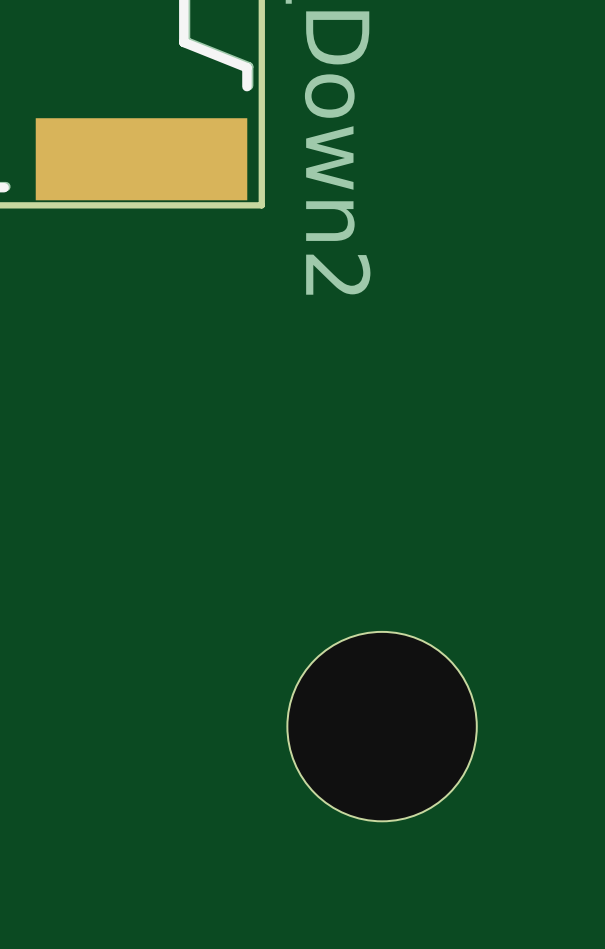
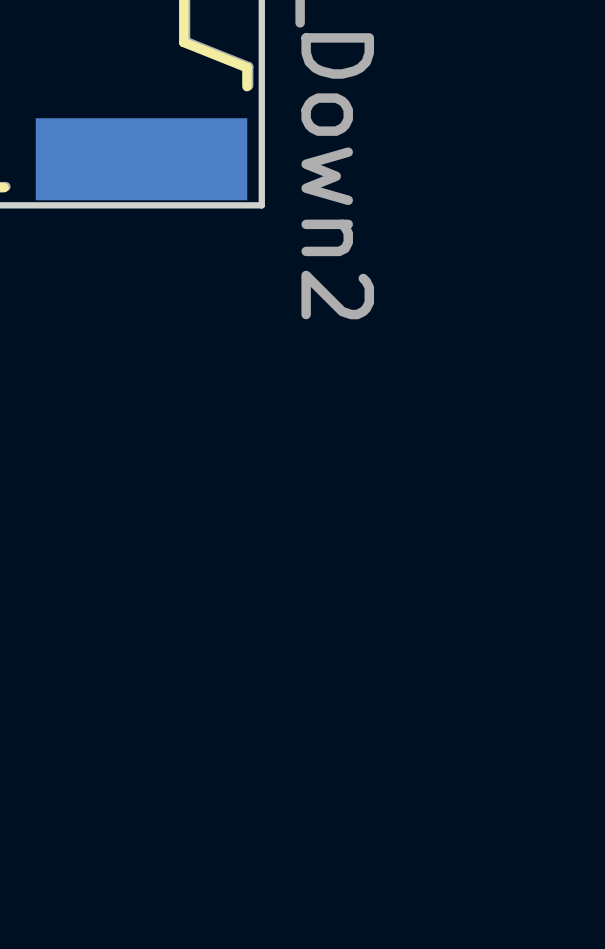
part: (382, 726) -> none

